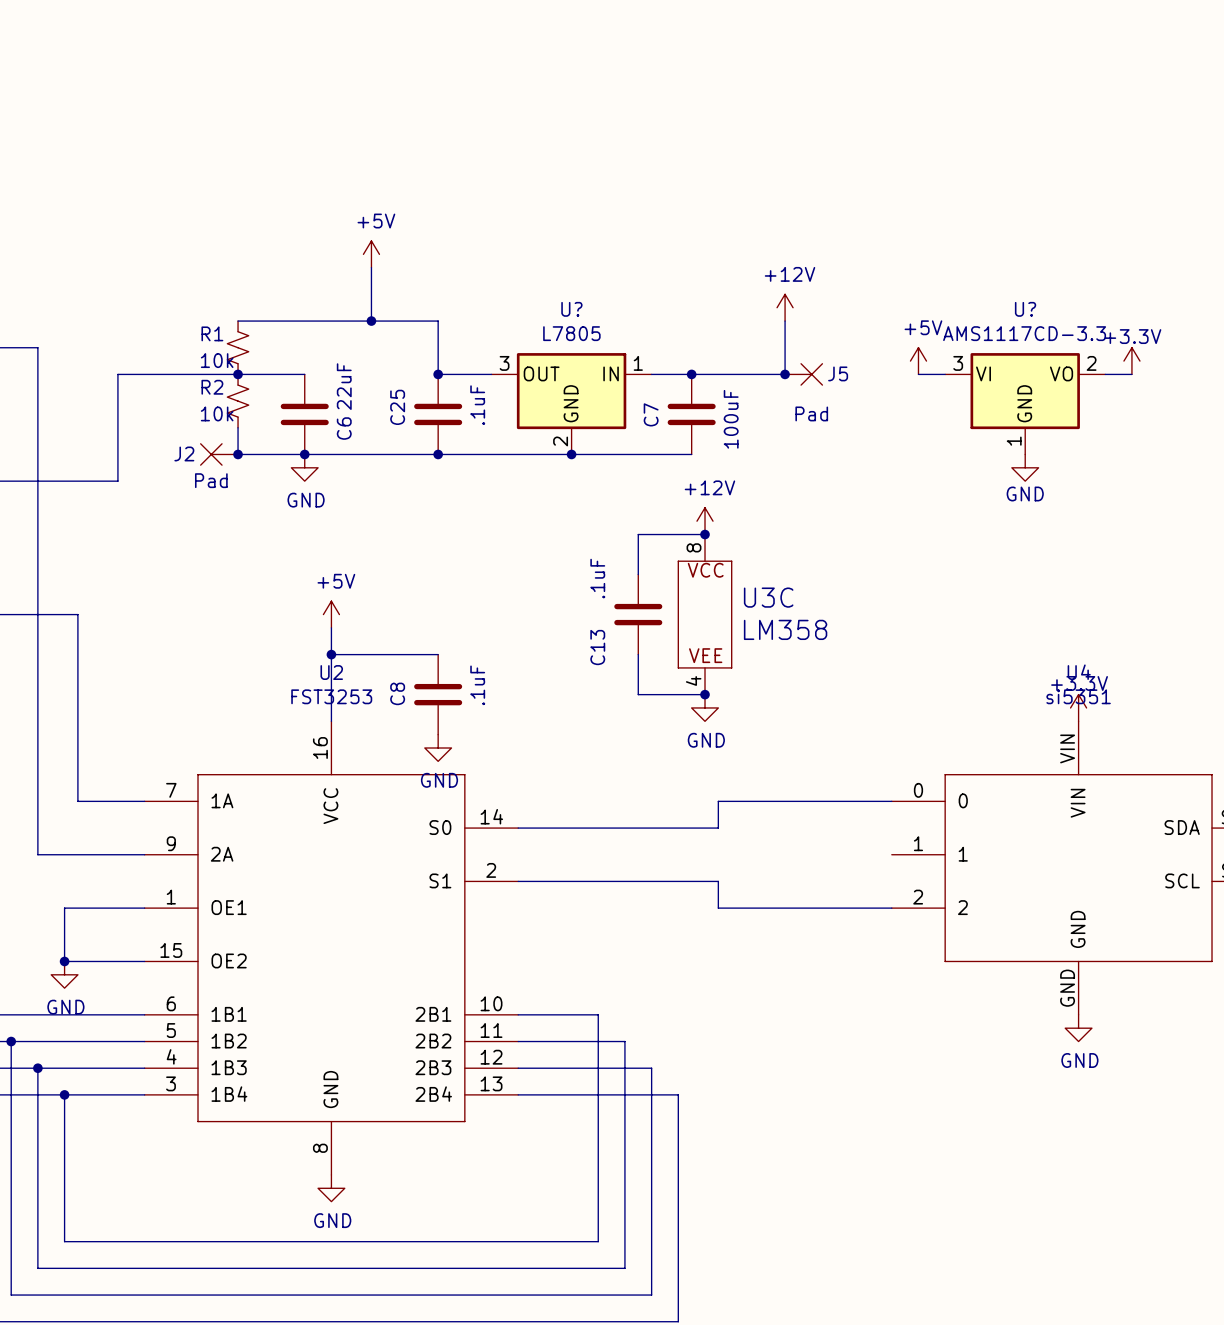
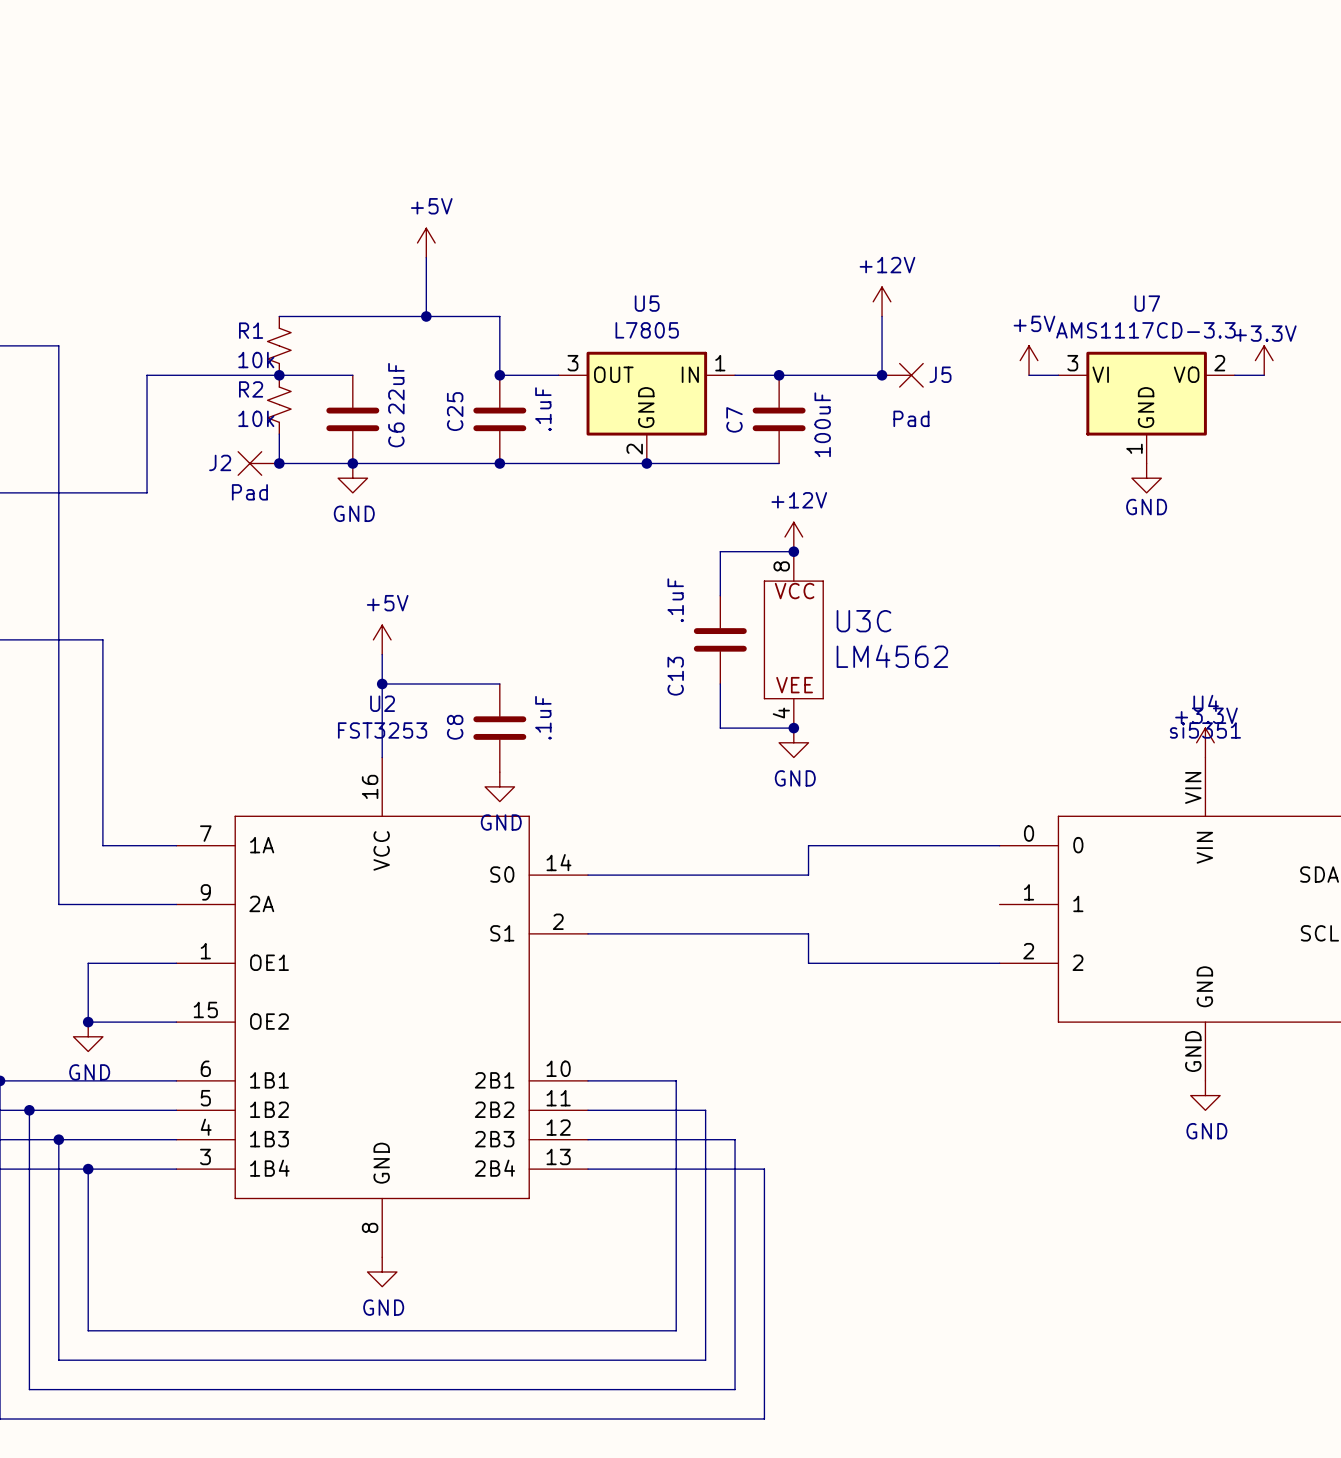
U? name: U? (571, 309) -> U5 (647, 303)
U? name: U? (1025, 309) -> U7 (1147, 303)
U3C value: LM358 (785, 629) -> LM4562 (892, 656)

